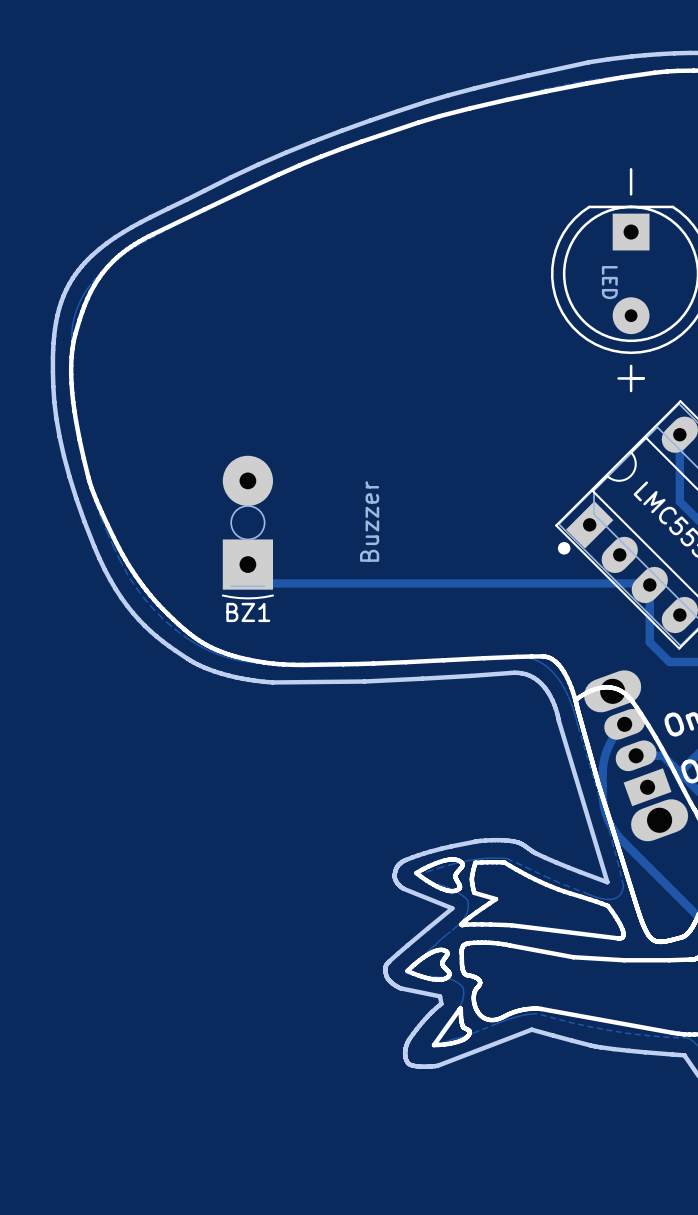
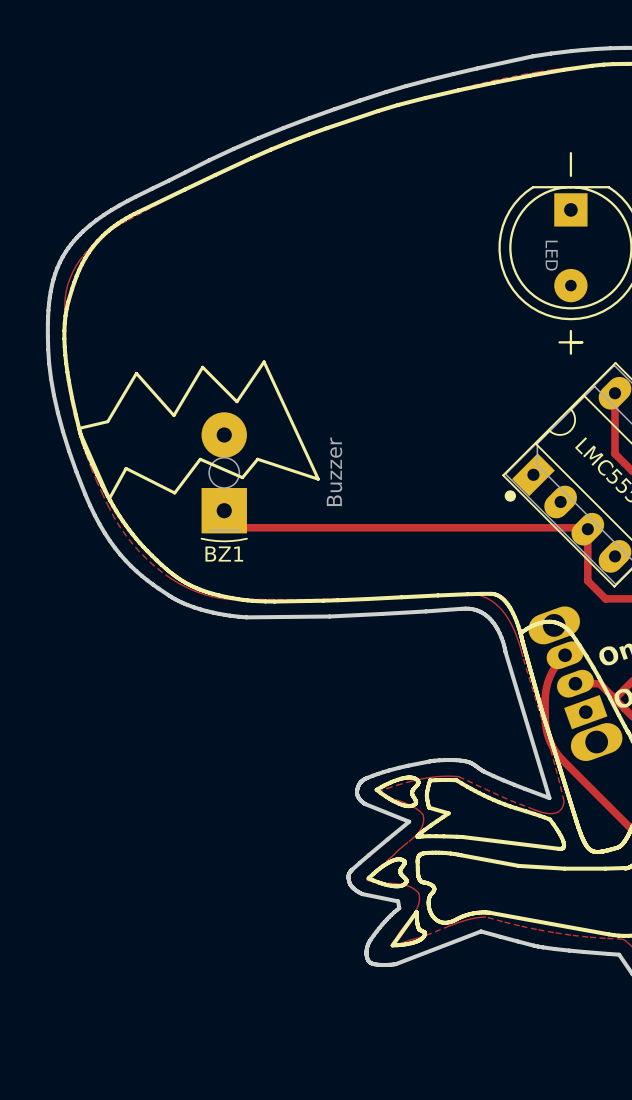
line: none -> (264, 361) (236, 401) (202, 367) (173, 415) (136, 373) (107, 421) (78, 428) (109, 498) (126, 468) (174, 493) (200, 459) (242, 477) (257, 459) (318, 479) (264, 361)

